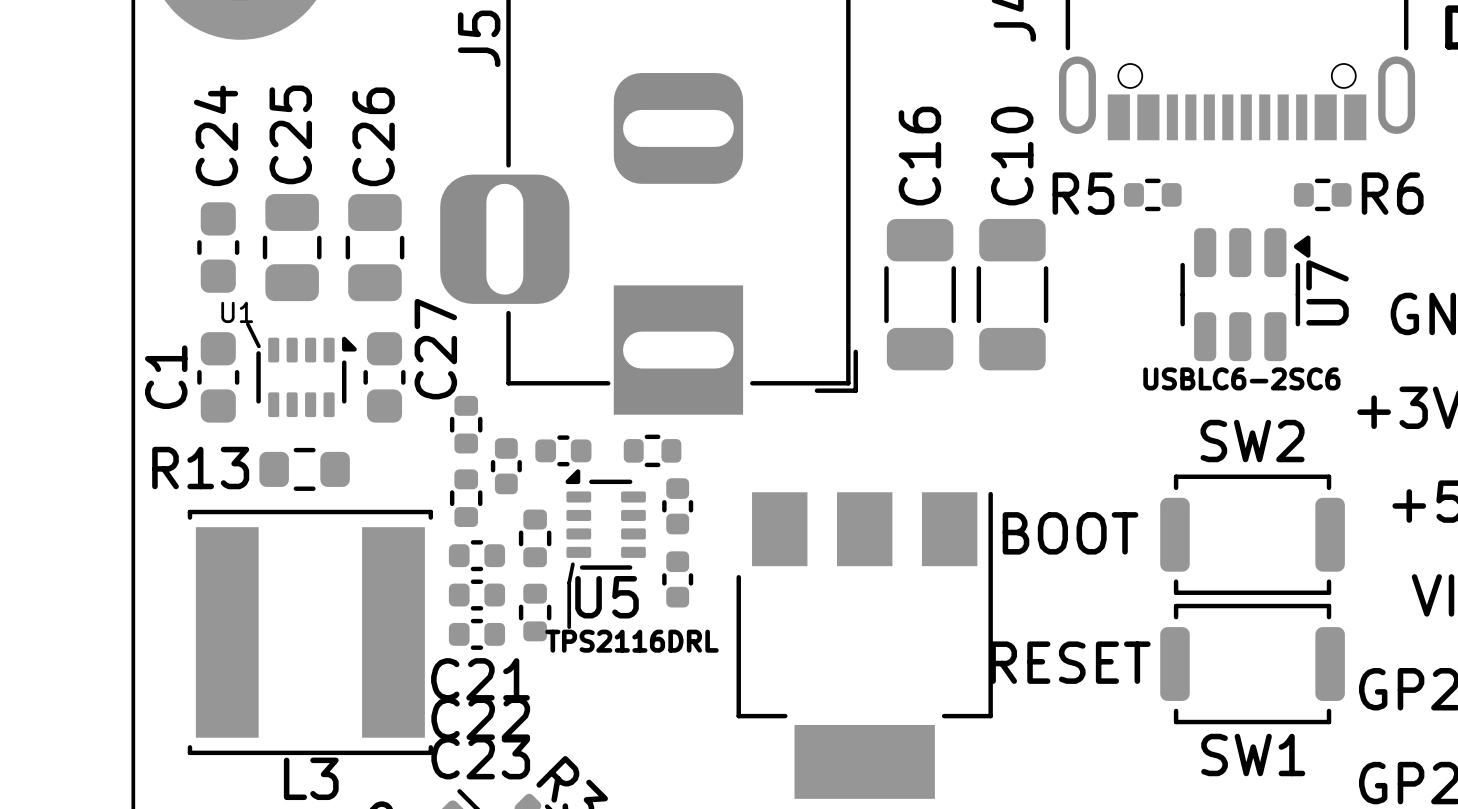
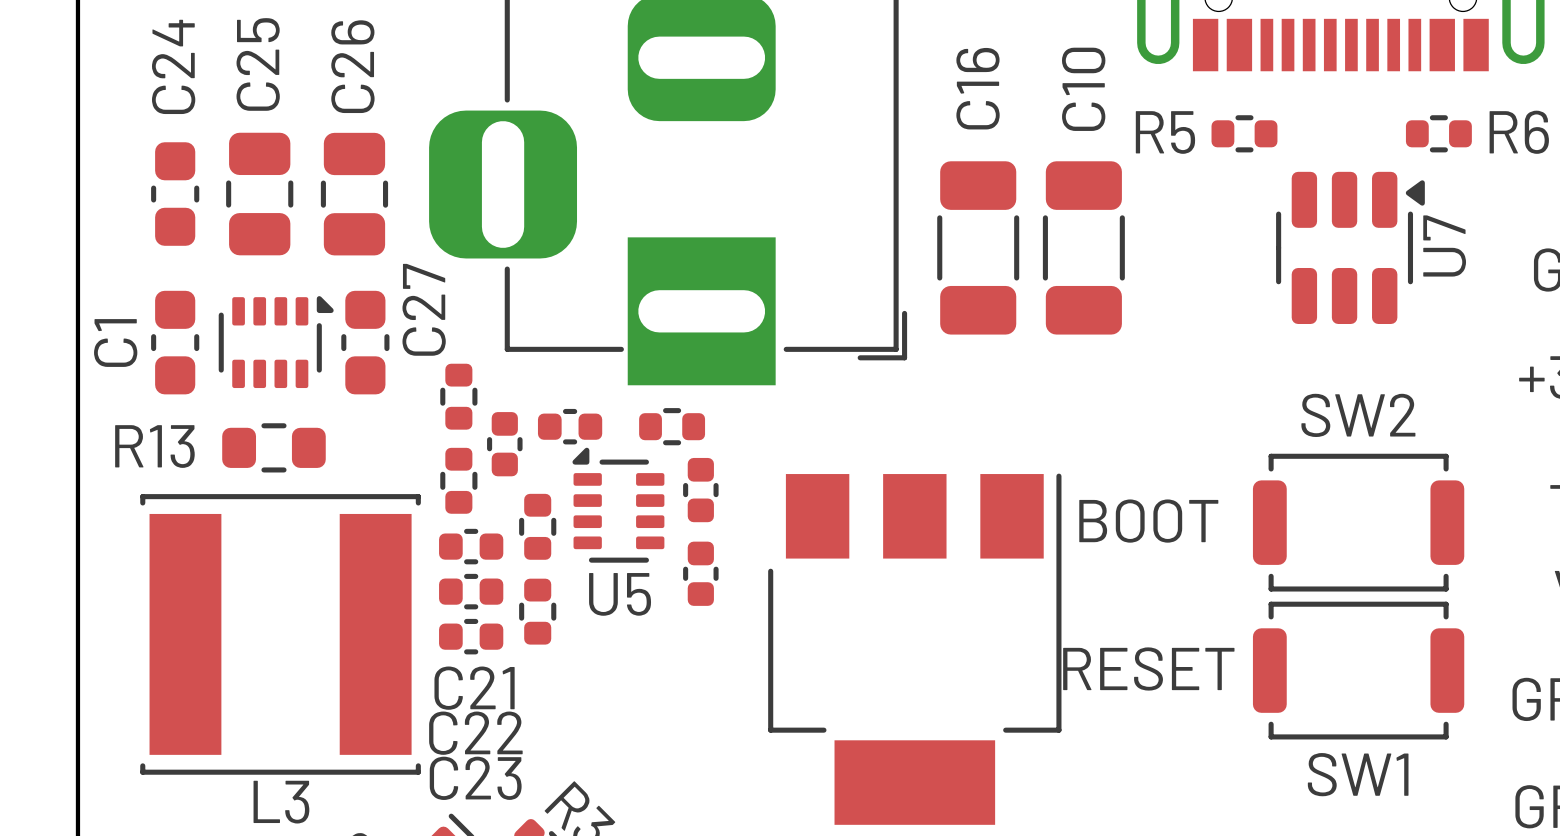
U1 name: U1 (237, 312) -> none
line: (247, 324) (258, 346) -> none
U7 value: USBLC6-2SC6 (1241, 378) -> none
line: (572, 564) (569, 582) (569, 627) -> none
U5 value: TPS2116DRL (631, 641) -> none

